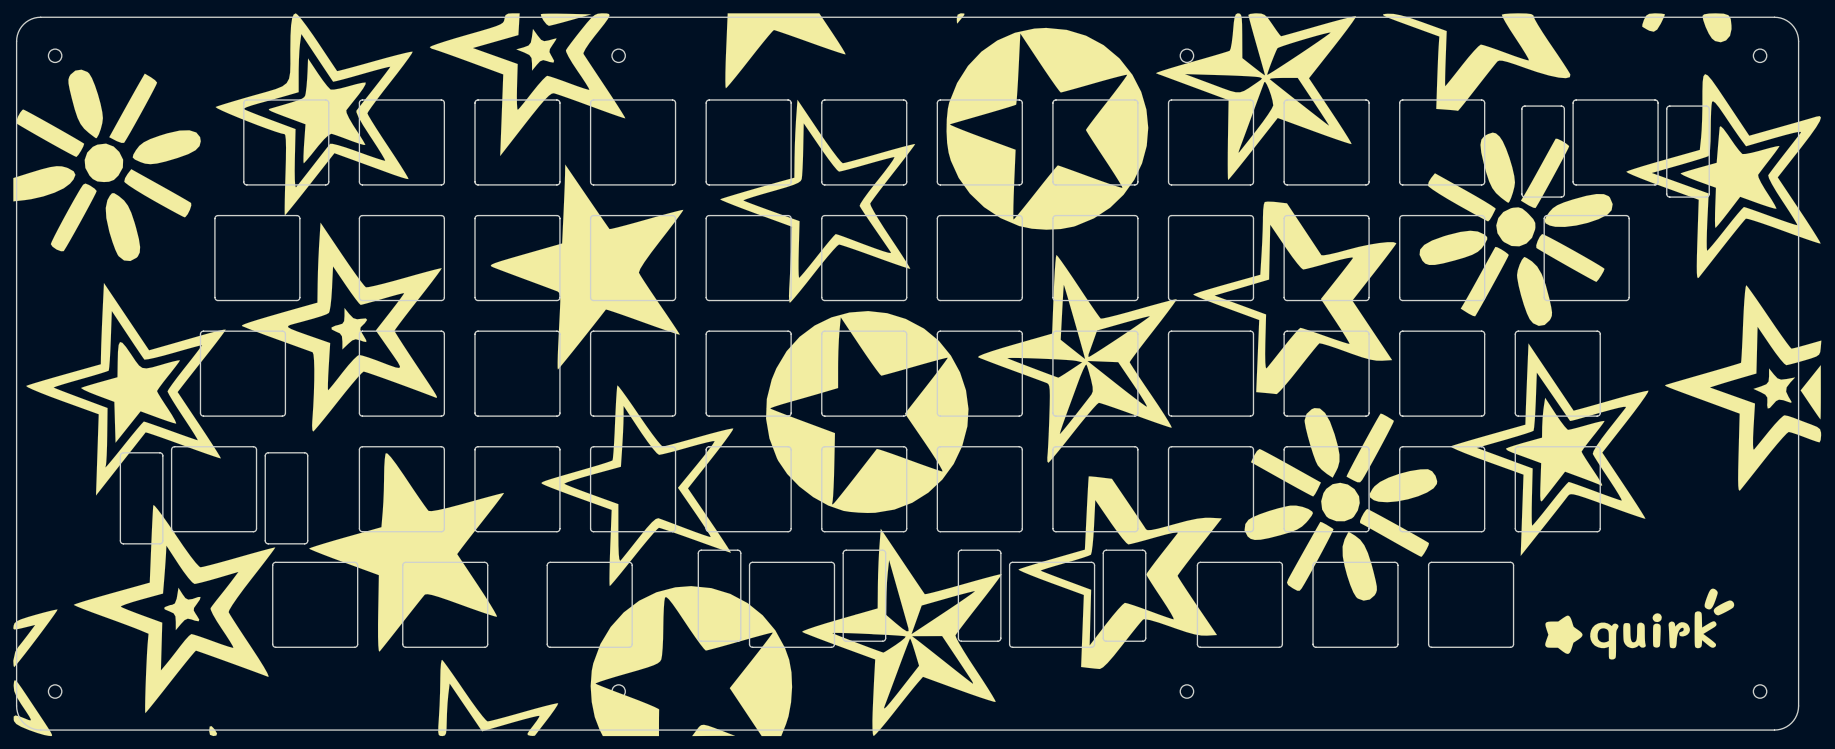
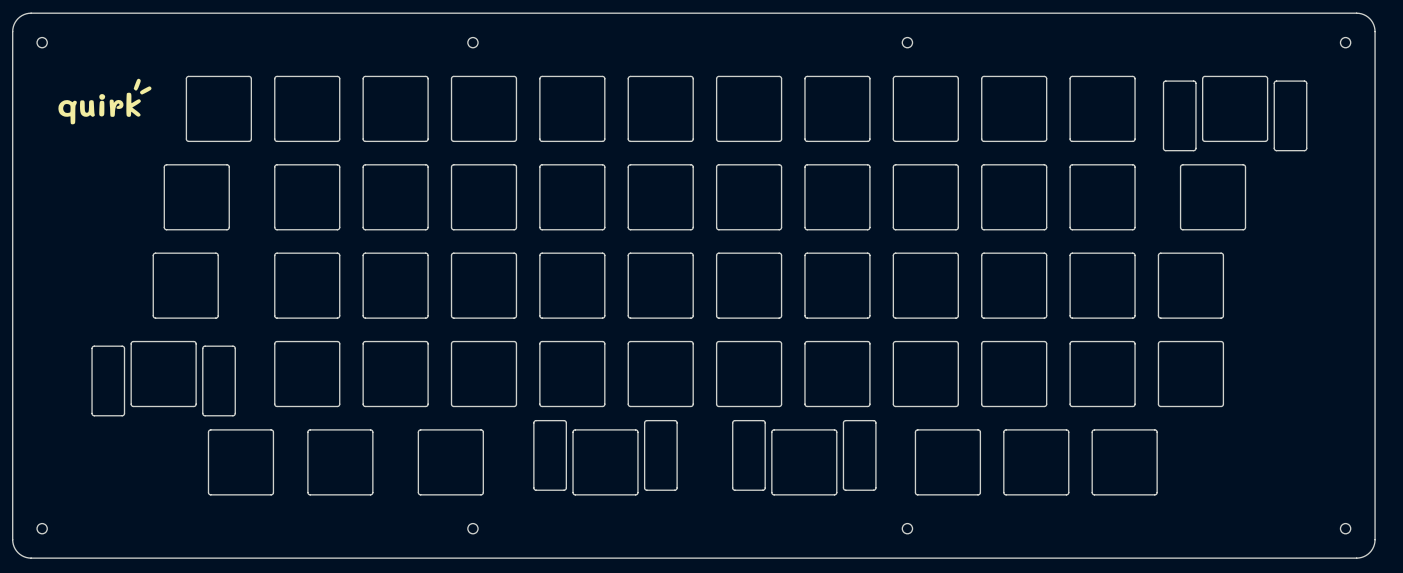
drawing: [13, 13, 1822, 737] -> none
drawing: none -> [58, 78, 152, 125]

